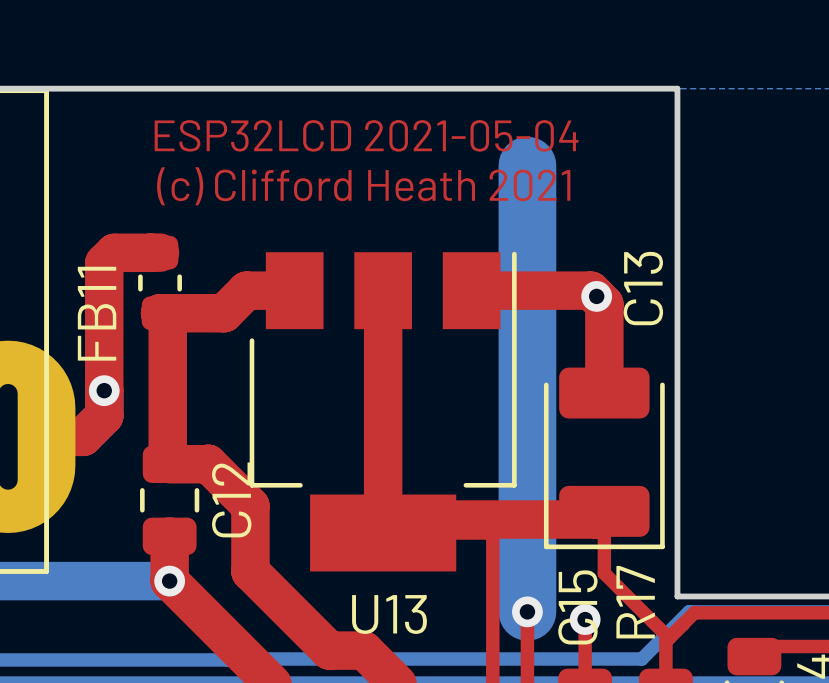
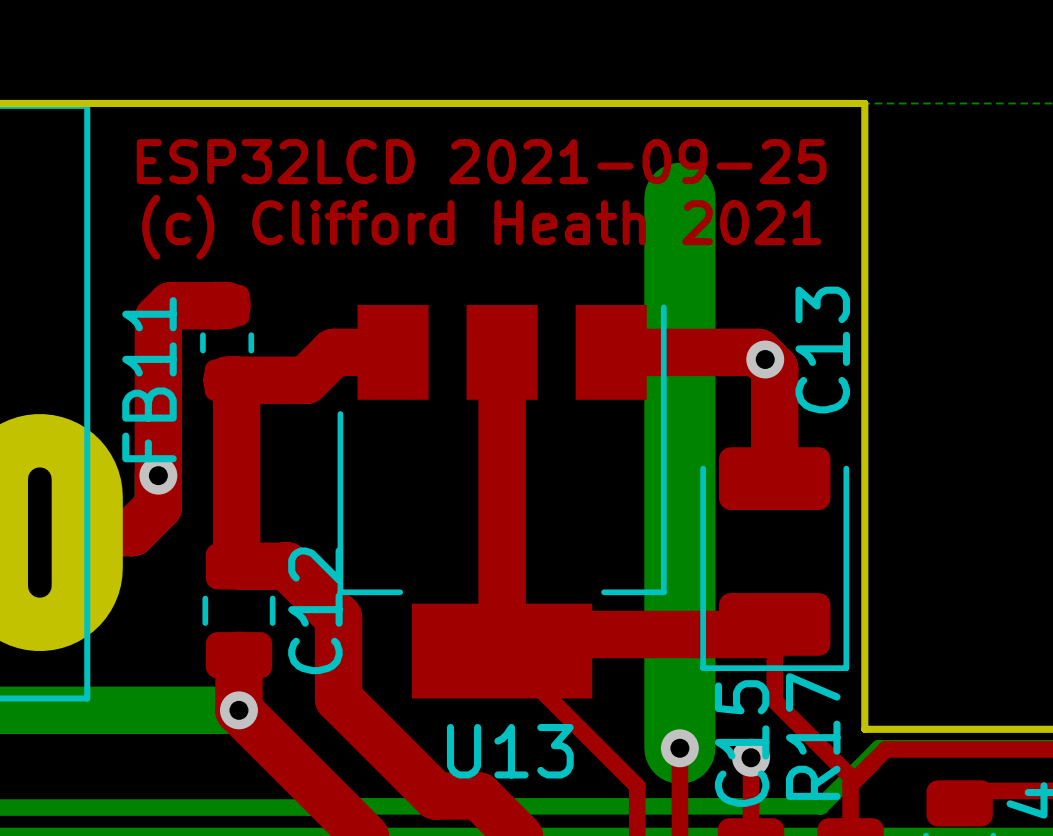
text: ESP32LCD 2021-05-04 (366, 135) -> ESP32LCD 2021-09-25 (481, 161)
top track: (383, 533) (492, 533) (492, 642) -> (502, 651) (637, 786)

